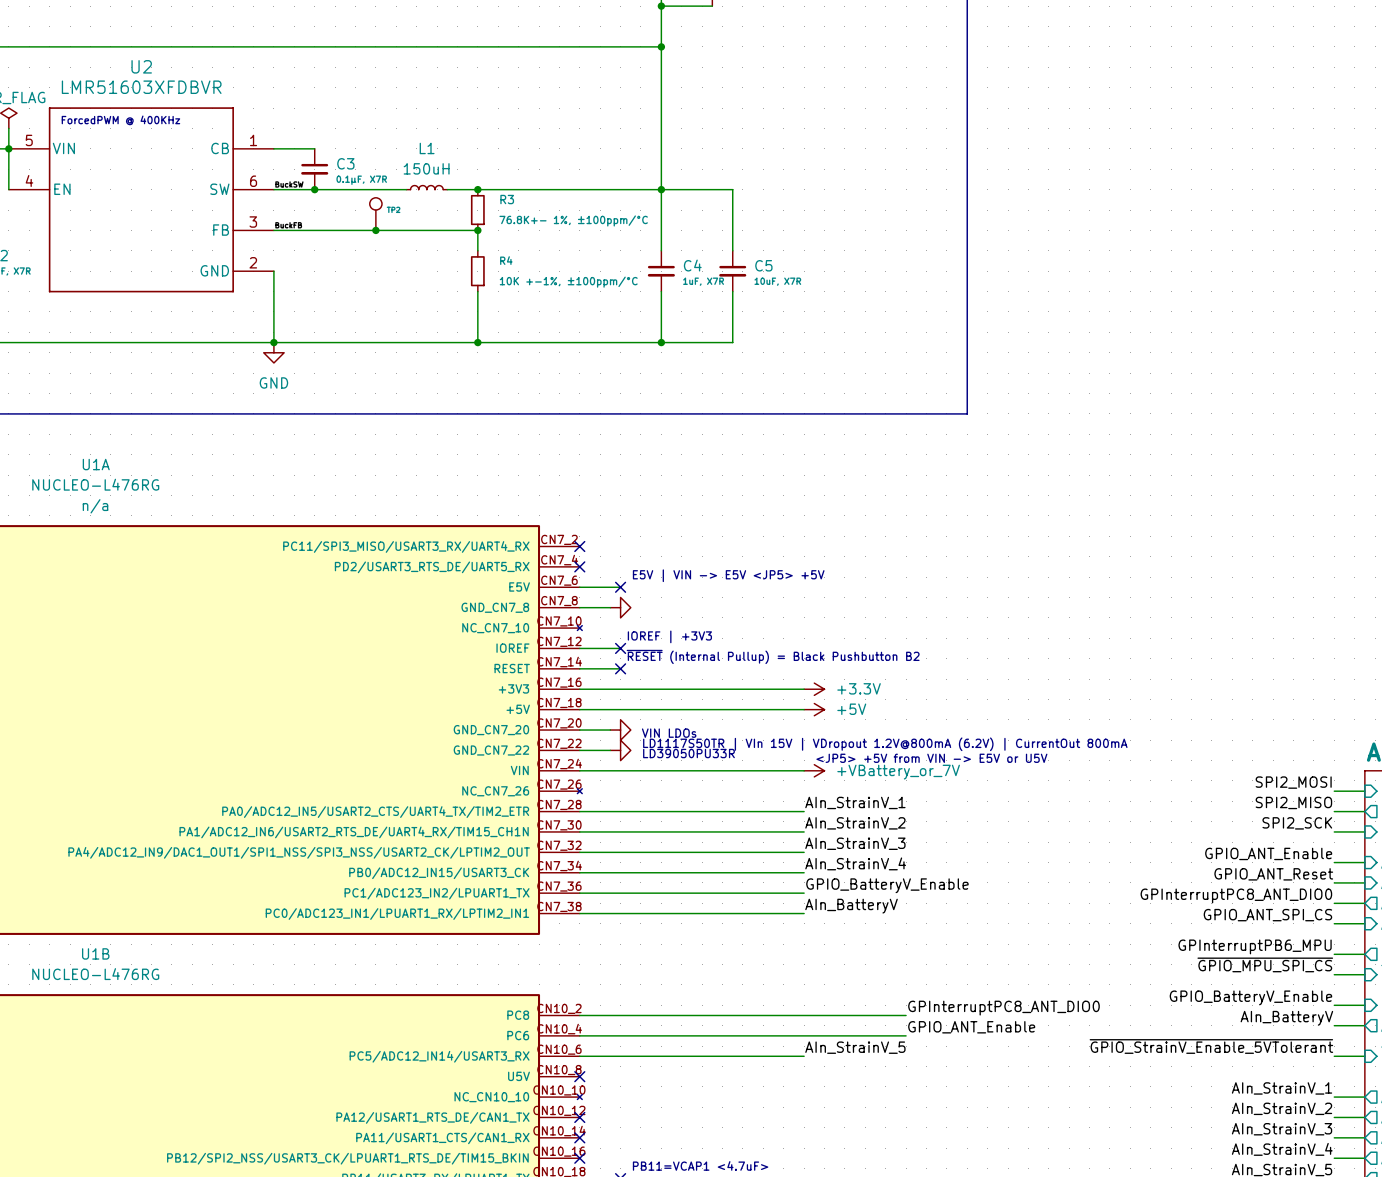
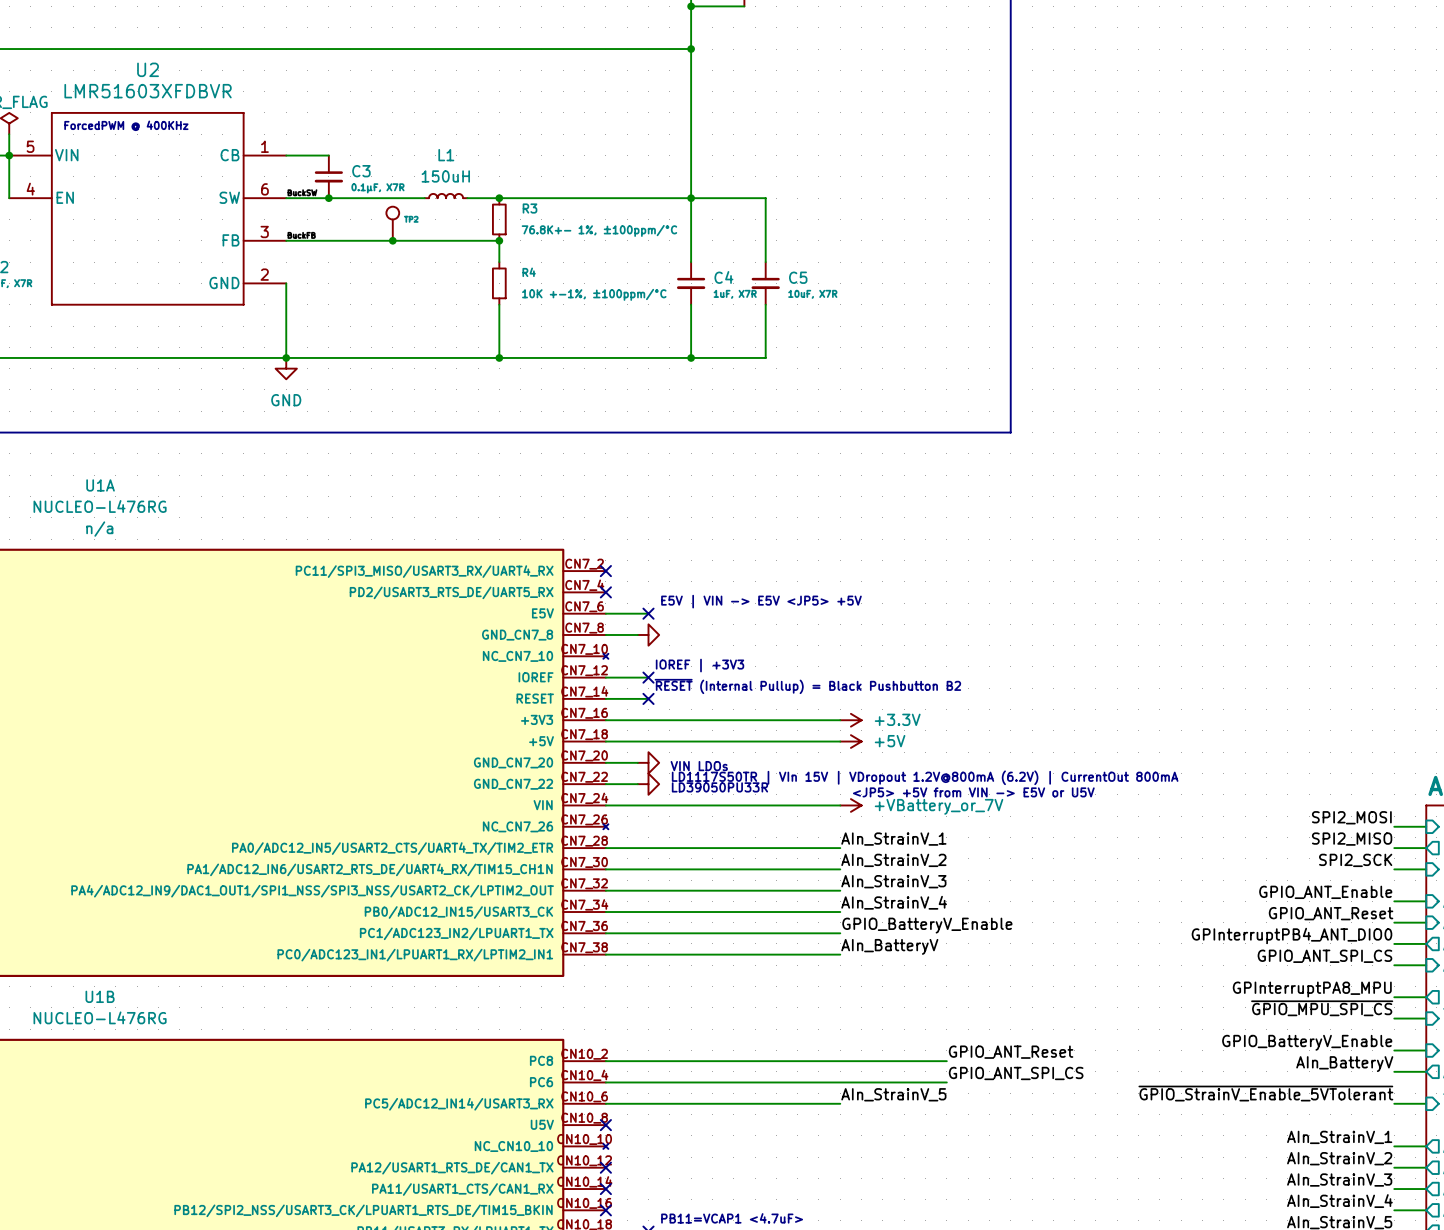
label: GPInterruptPC8_ANT_DIO0 (1236, 895) -> GPInterruptPB4_ANT_DIO0 (1291, 935)
label: GPInterruptPB6_MPU (1255, 946) -> GPInterruptPA8_MPU (1312, 989)
label: GPInterruptPC8_ANT_DIO0 (1003, 1008) -> GPIO_ANT_Reset (1011, 1052)
label: GPIO_ANT_Enable (971, 1027) -> GPIO_ANT_SPI_CS (1016, 1073)

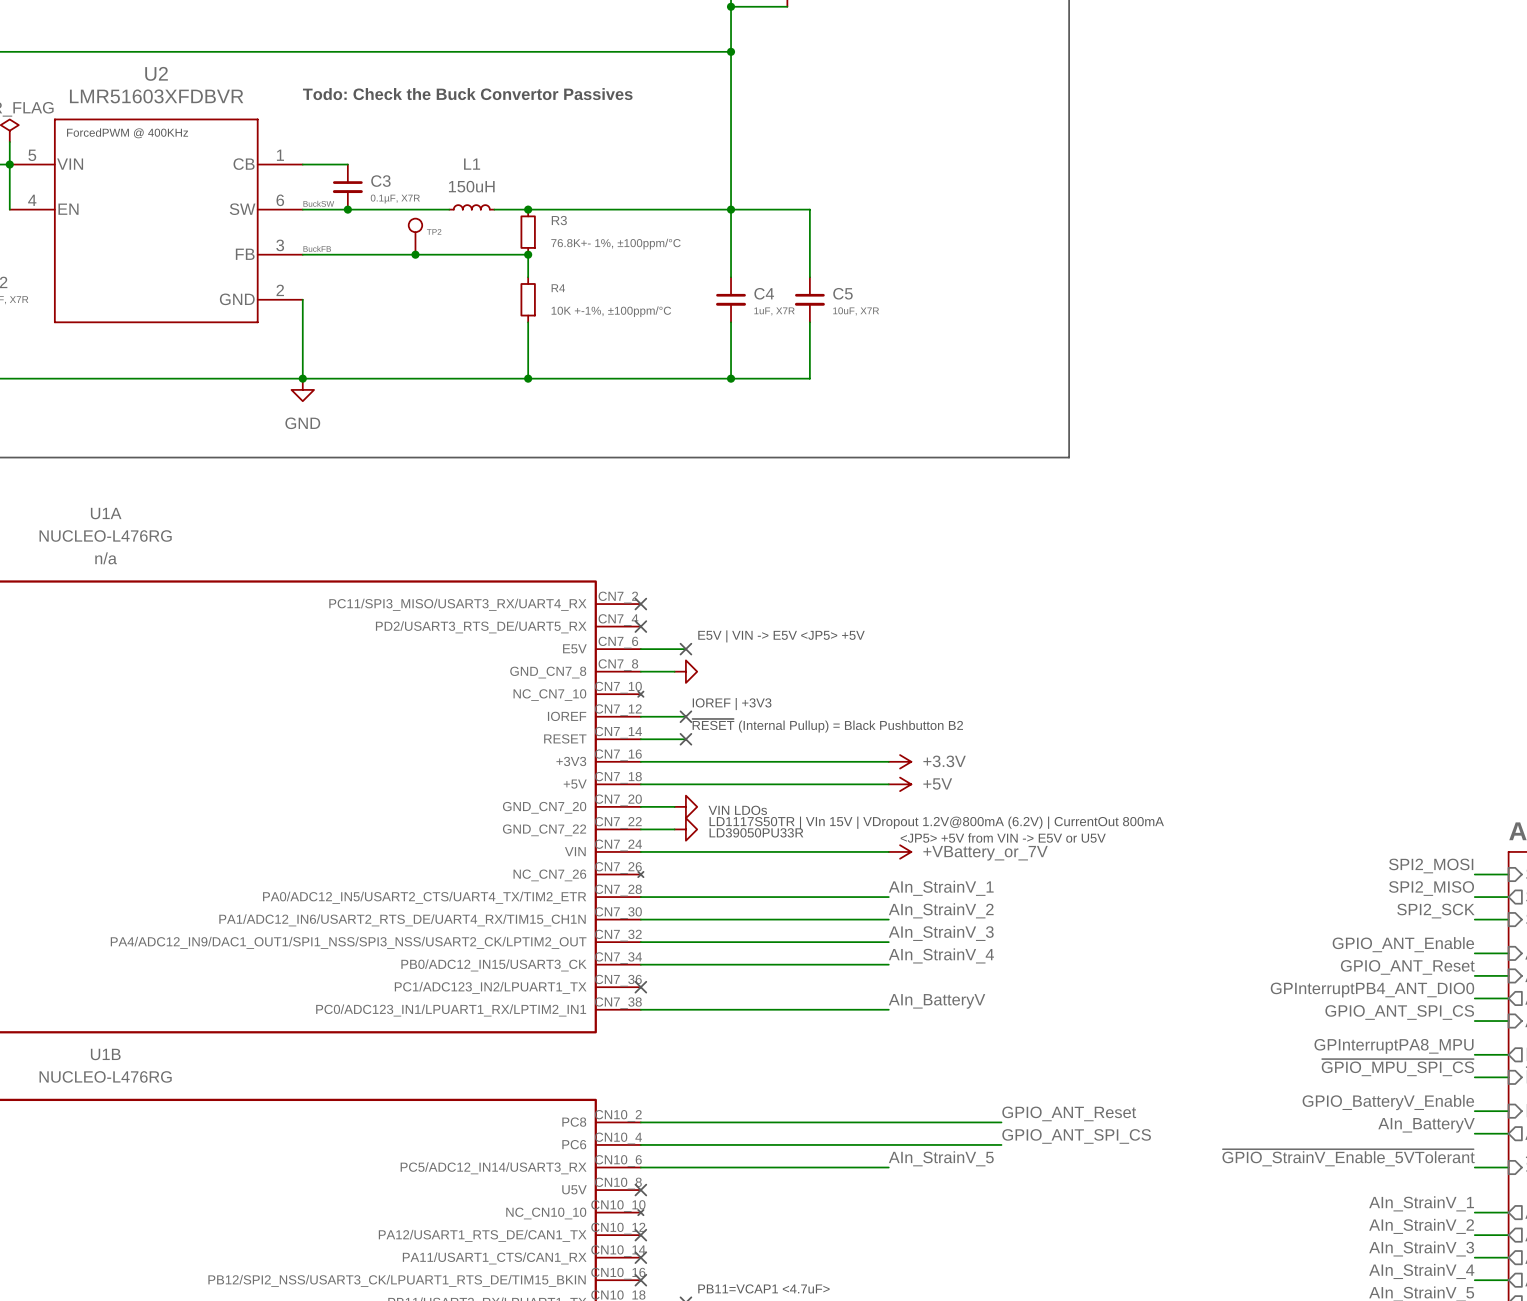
text: none -> Todo: Check the Buck Convertor Passives (467, 94)
label: GPIO_BatteryV_Enable (927, 925) -> none
wire: (605, 933) (840, 933) -> none
no-connect mark: none -> (640, 987)

